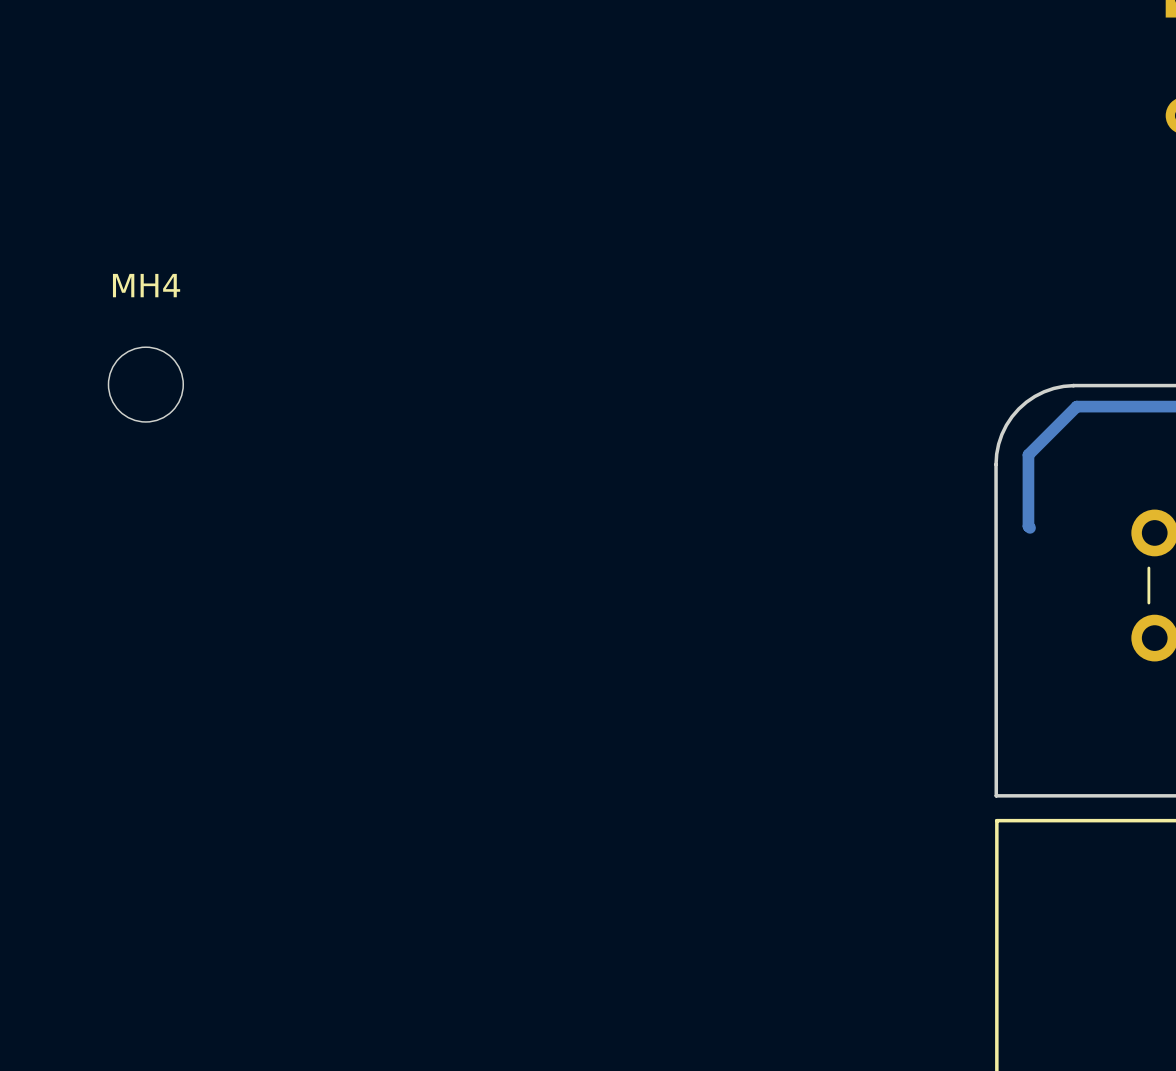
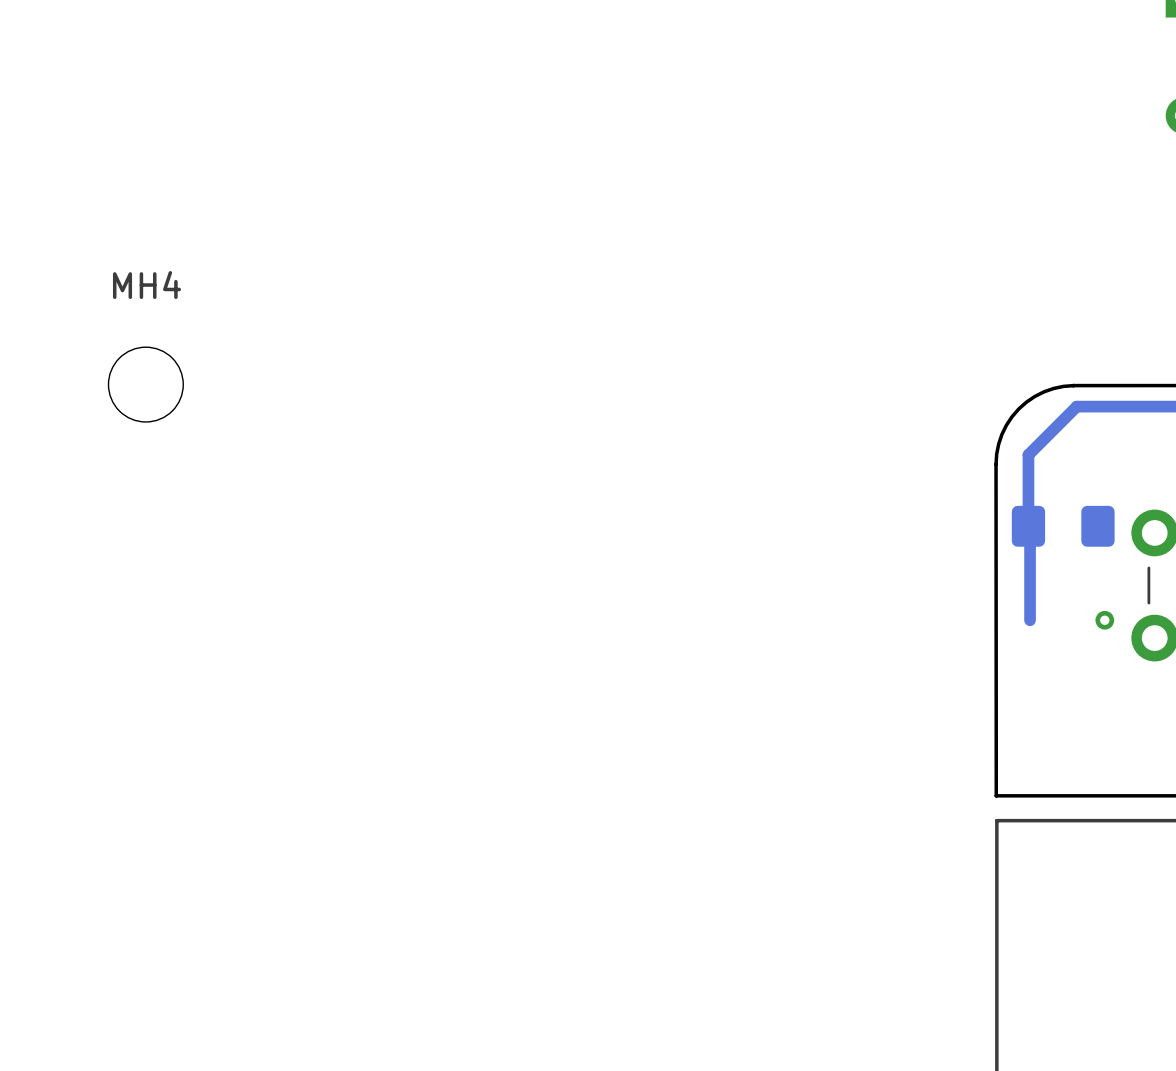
part: none -> (1063, 526)
bottom track: none -> (1030, 527) (1030, 620)
via: none -> (1104, 620)

